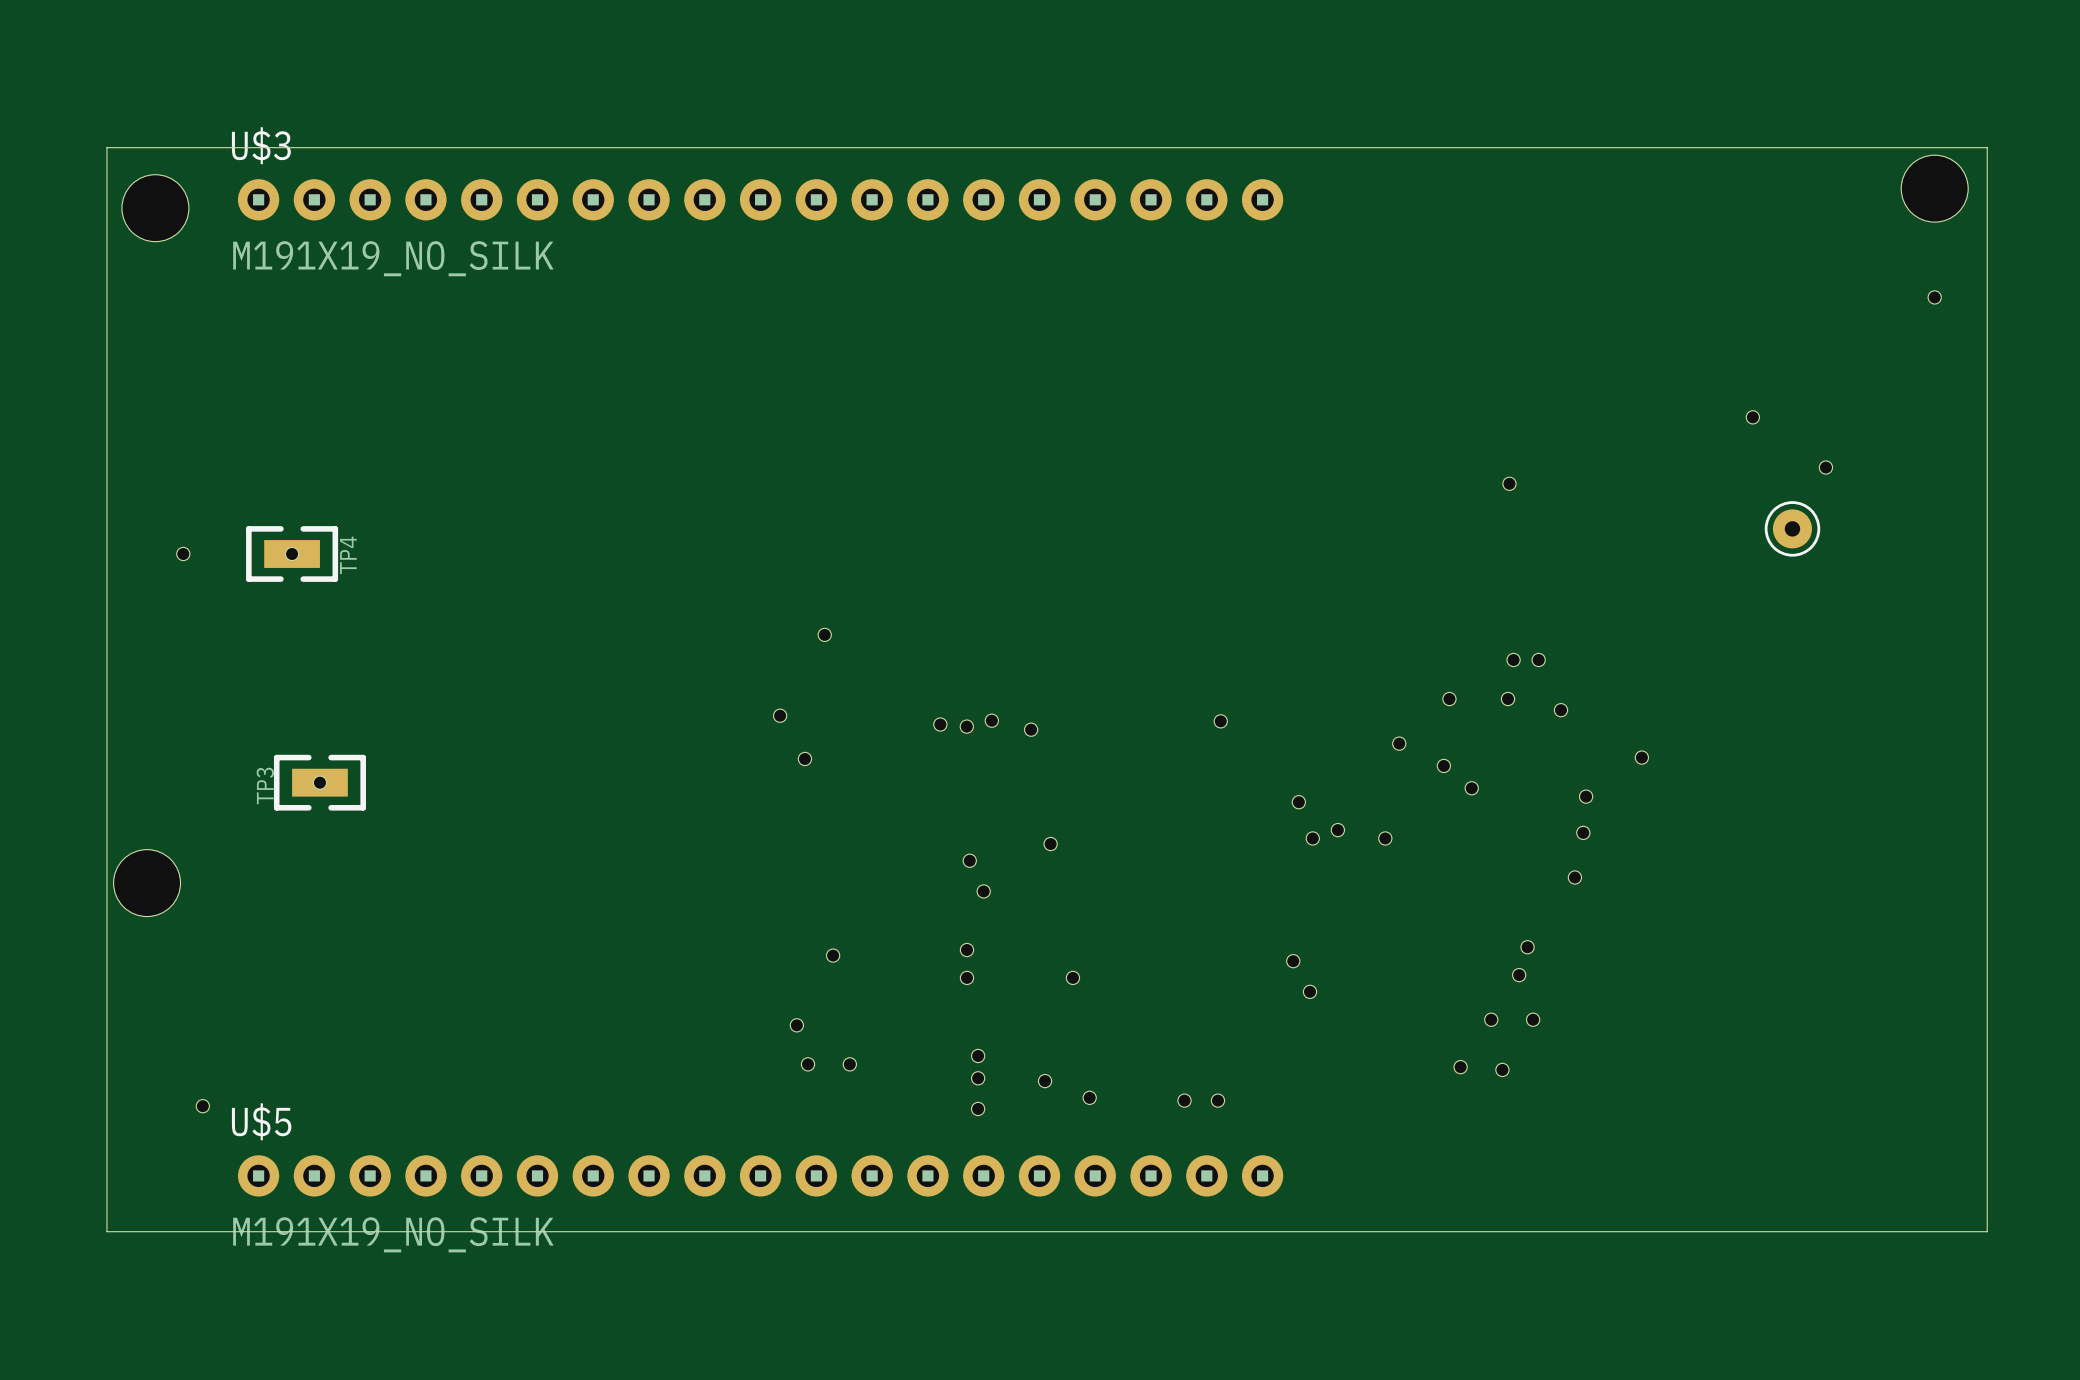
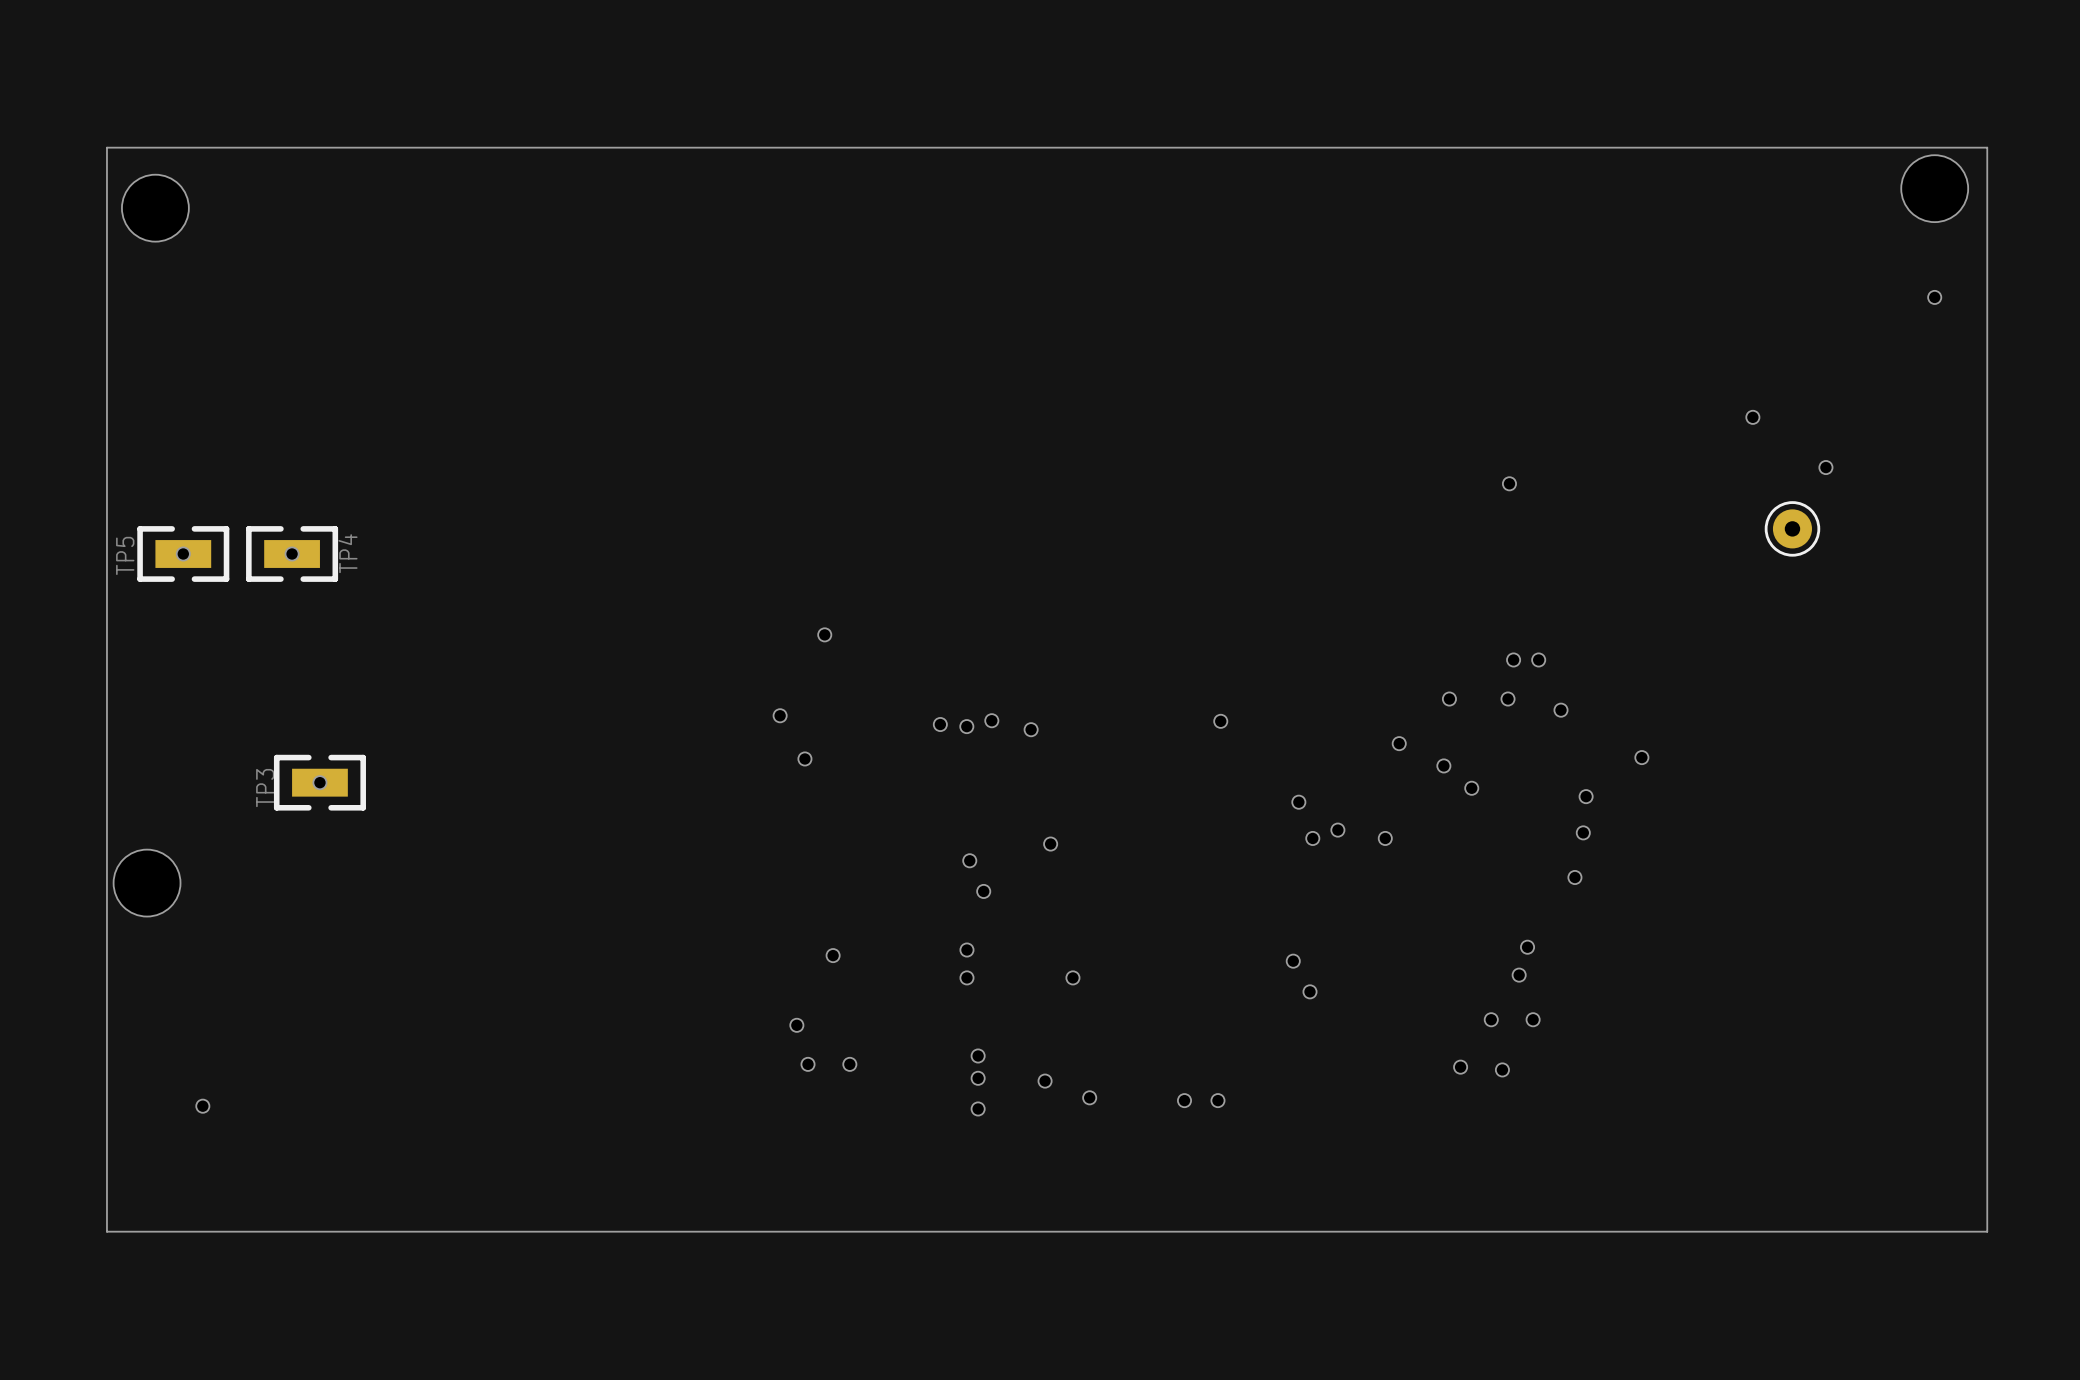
U$3: M191X19_NO_SILK (760, 199) -> none
TP5: none -> (183, 554)
U$5: M191X19_NO_SILK (760, 1175) -> none

